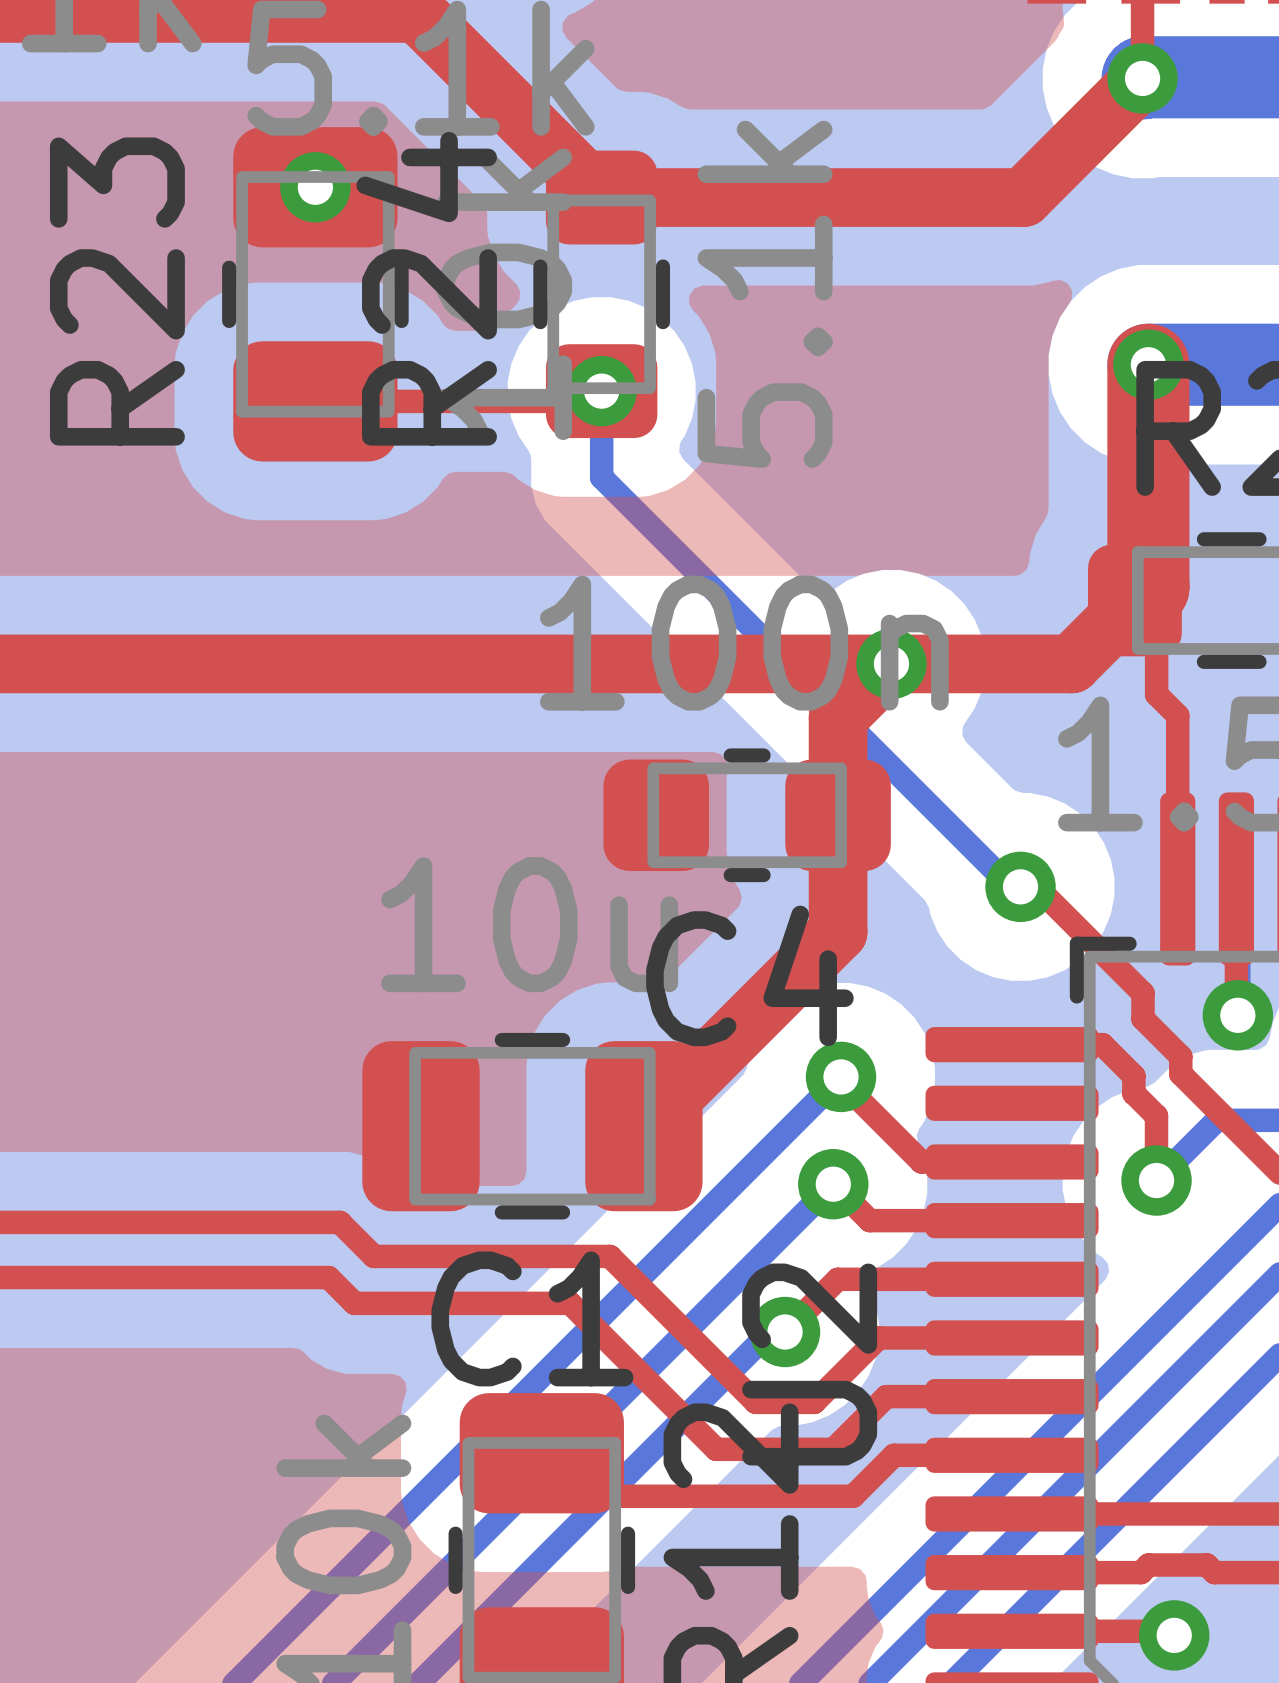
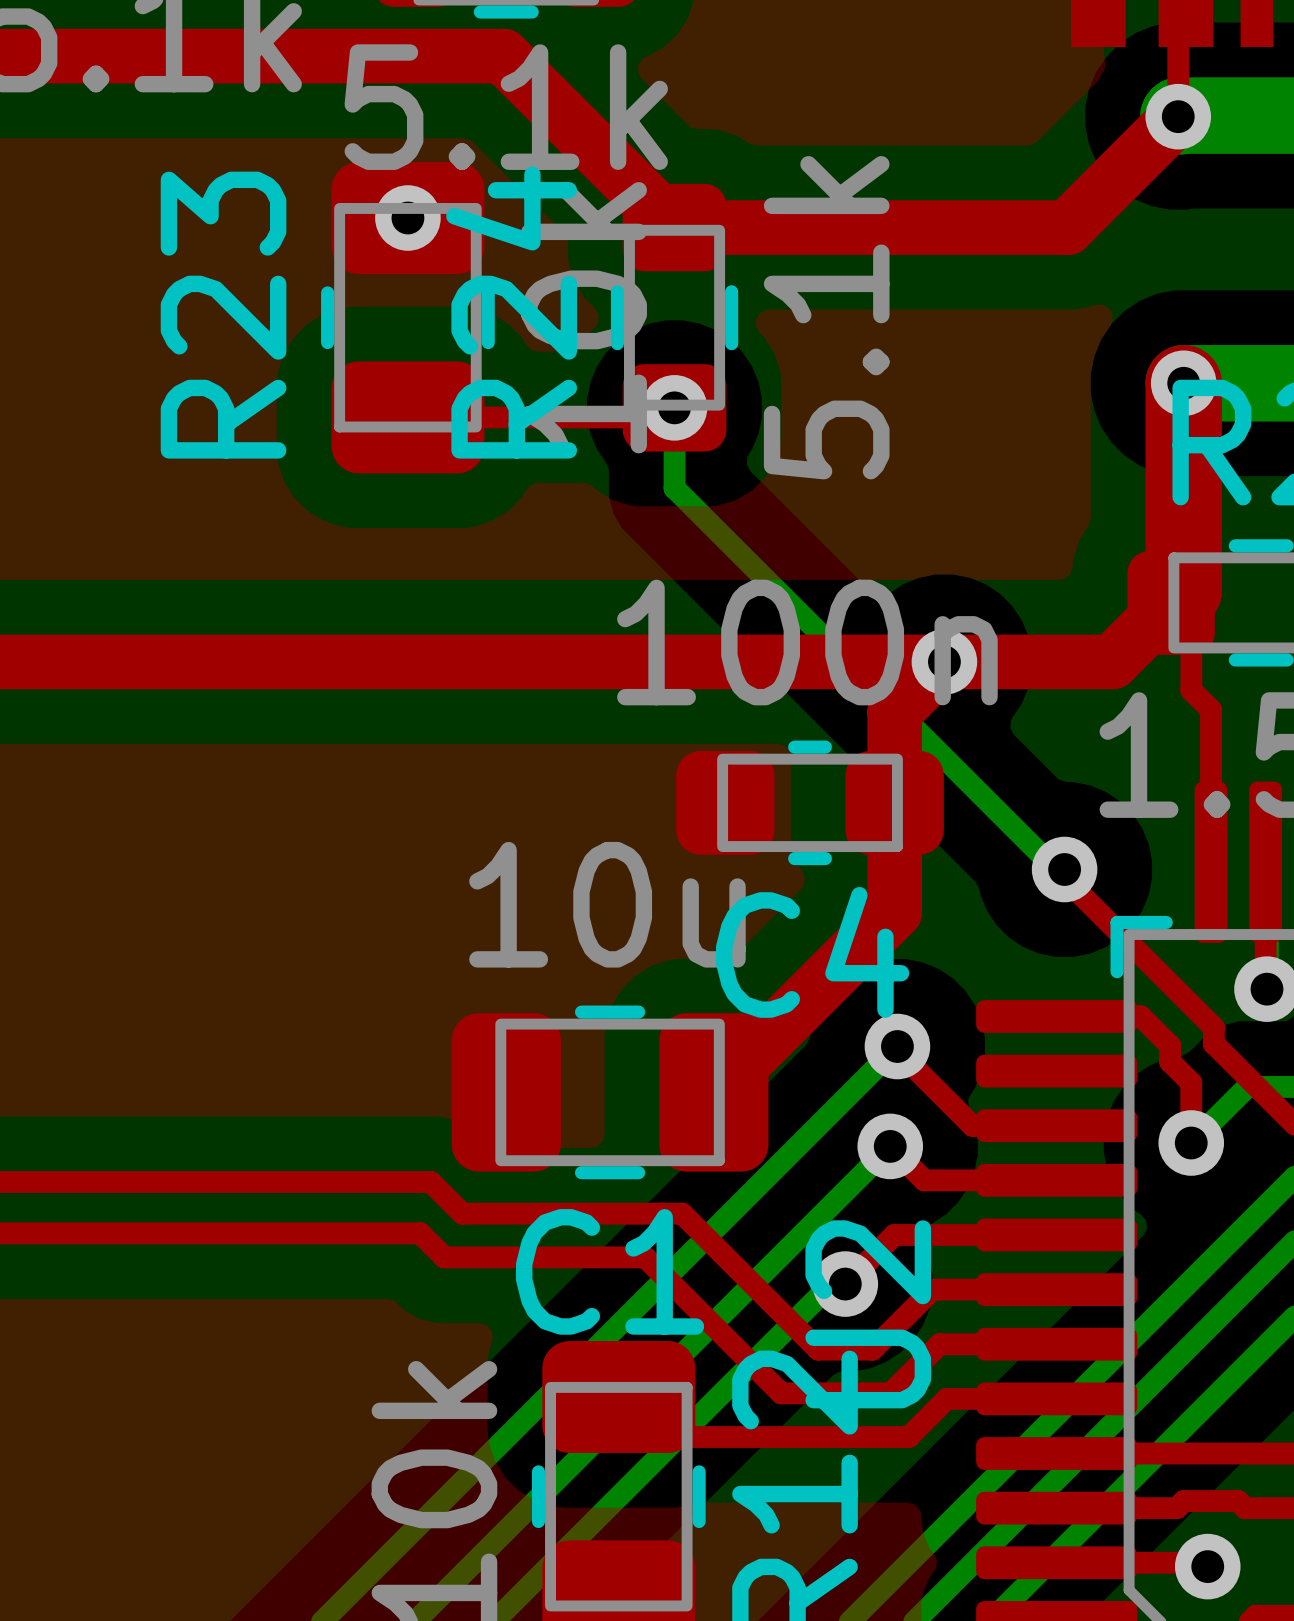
top track: (1020, 886) (1036, 886) (1142, 993) (1142, 1018) -> (1064, 869) (1064, 878) (1178, 992)

